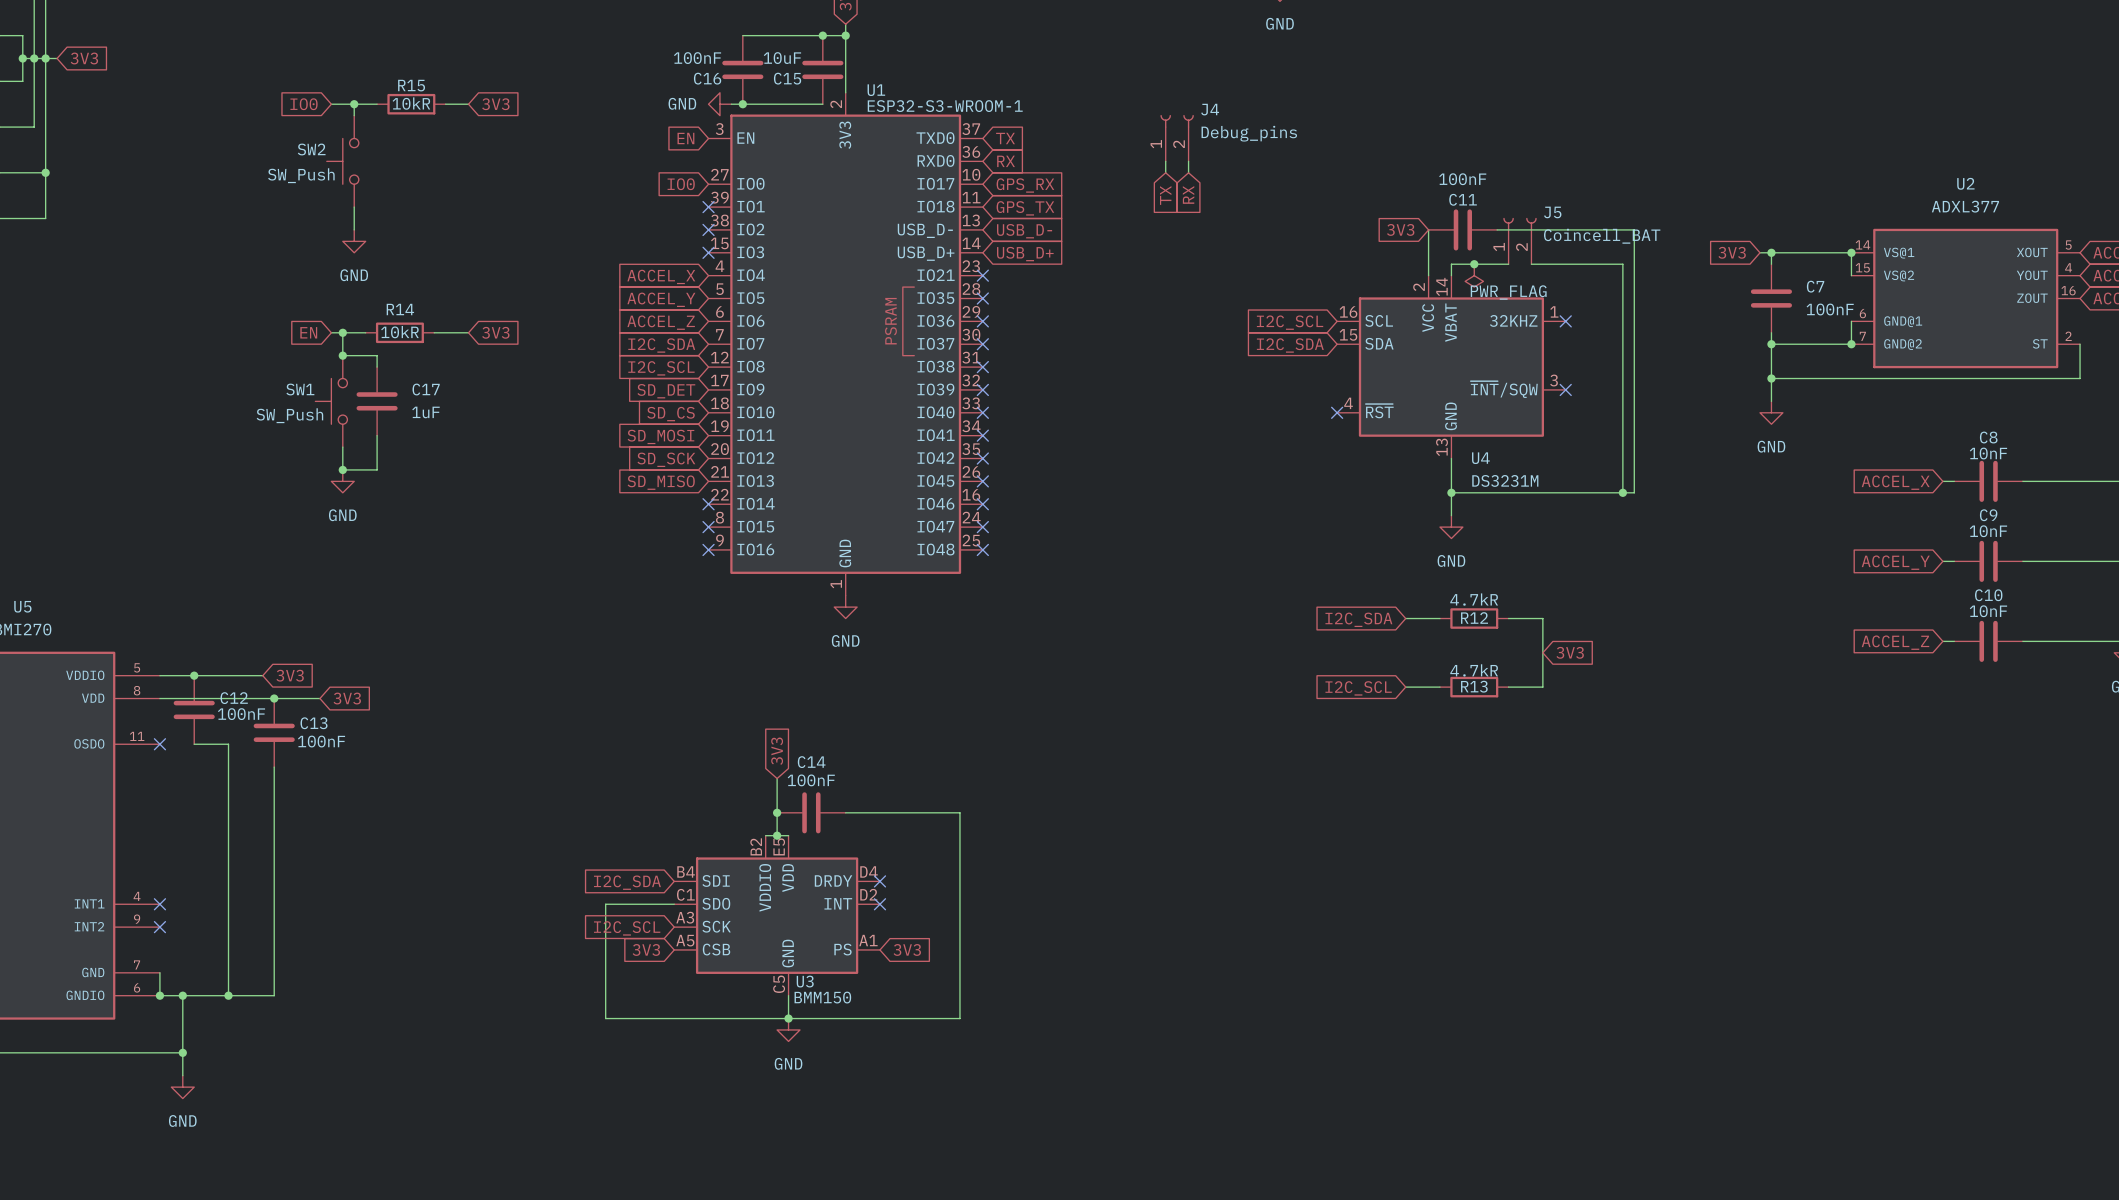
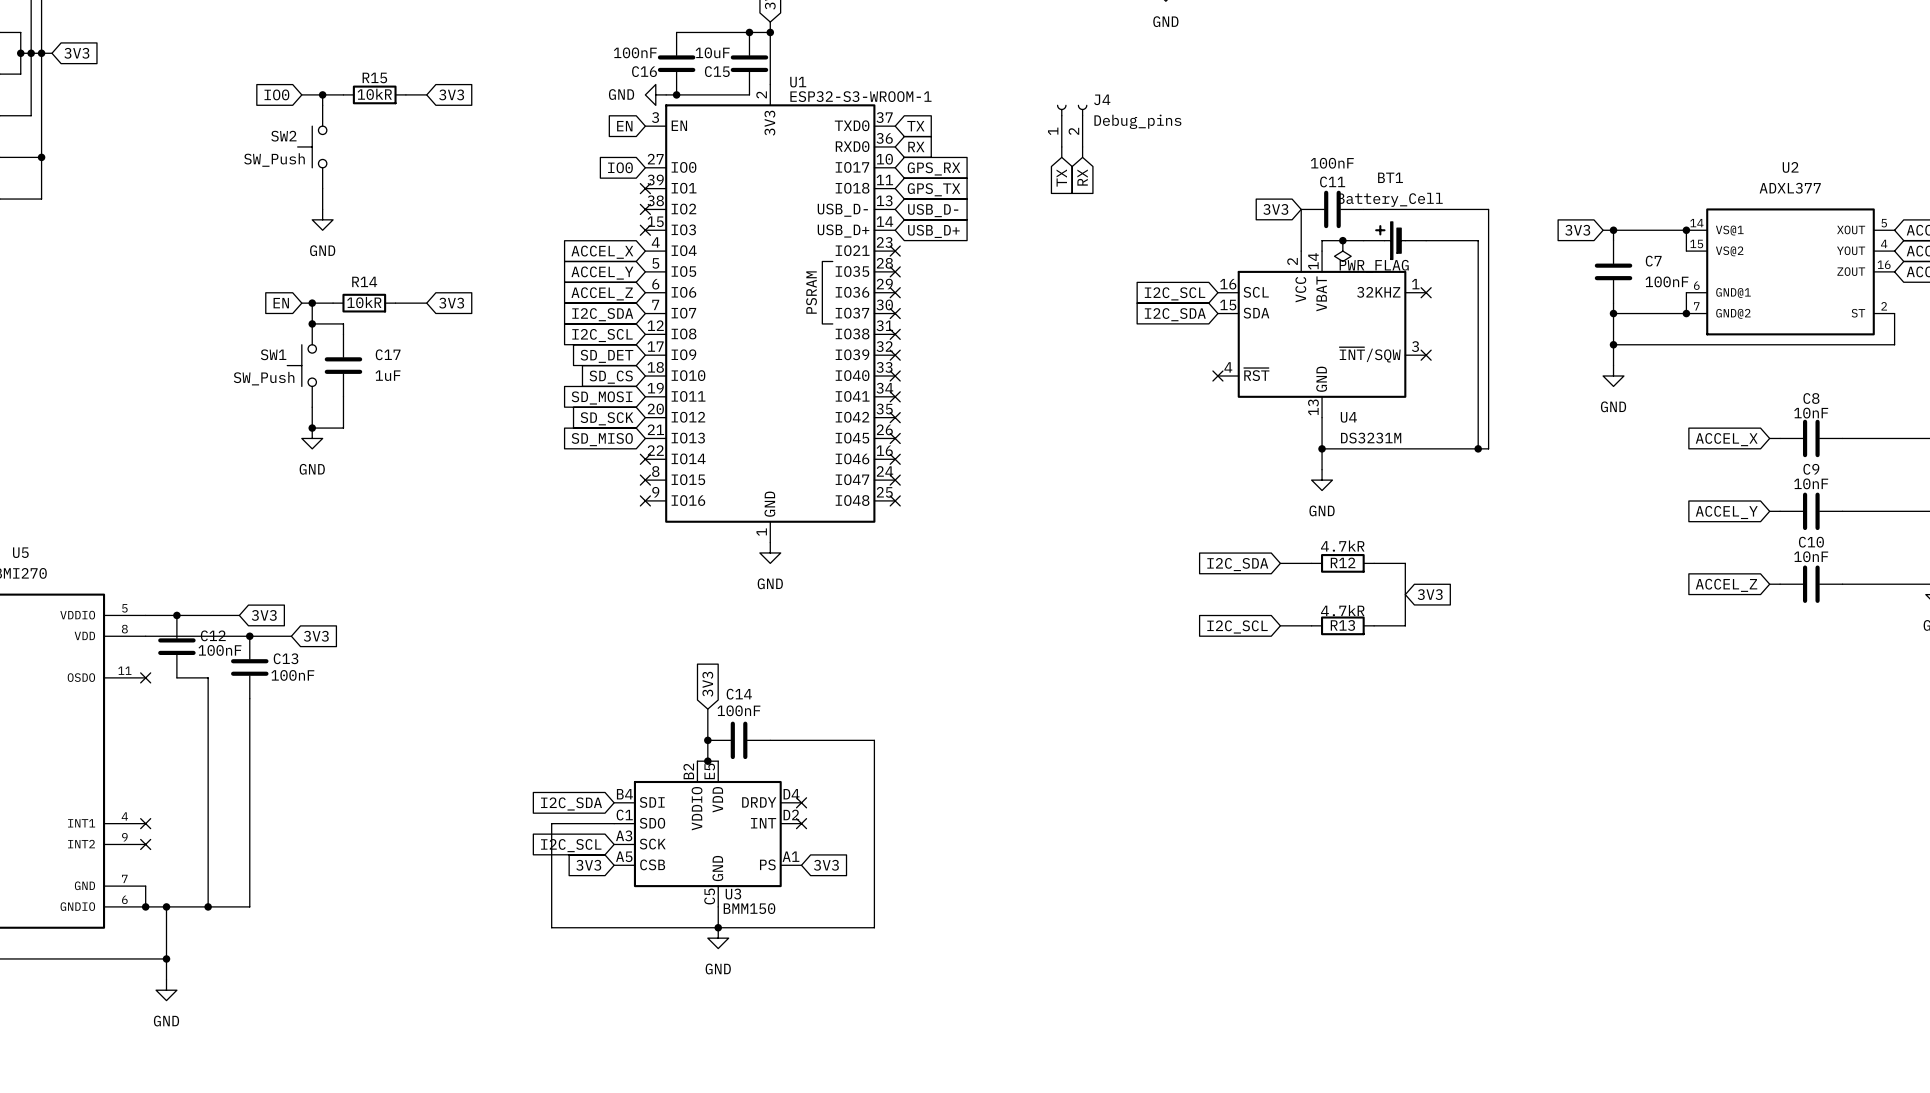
J5: Coincell_BAT (1520, 241) -> none
BT1: none -> Battery_Cell (1394, 240)

